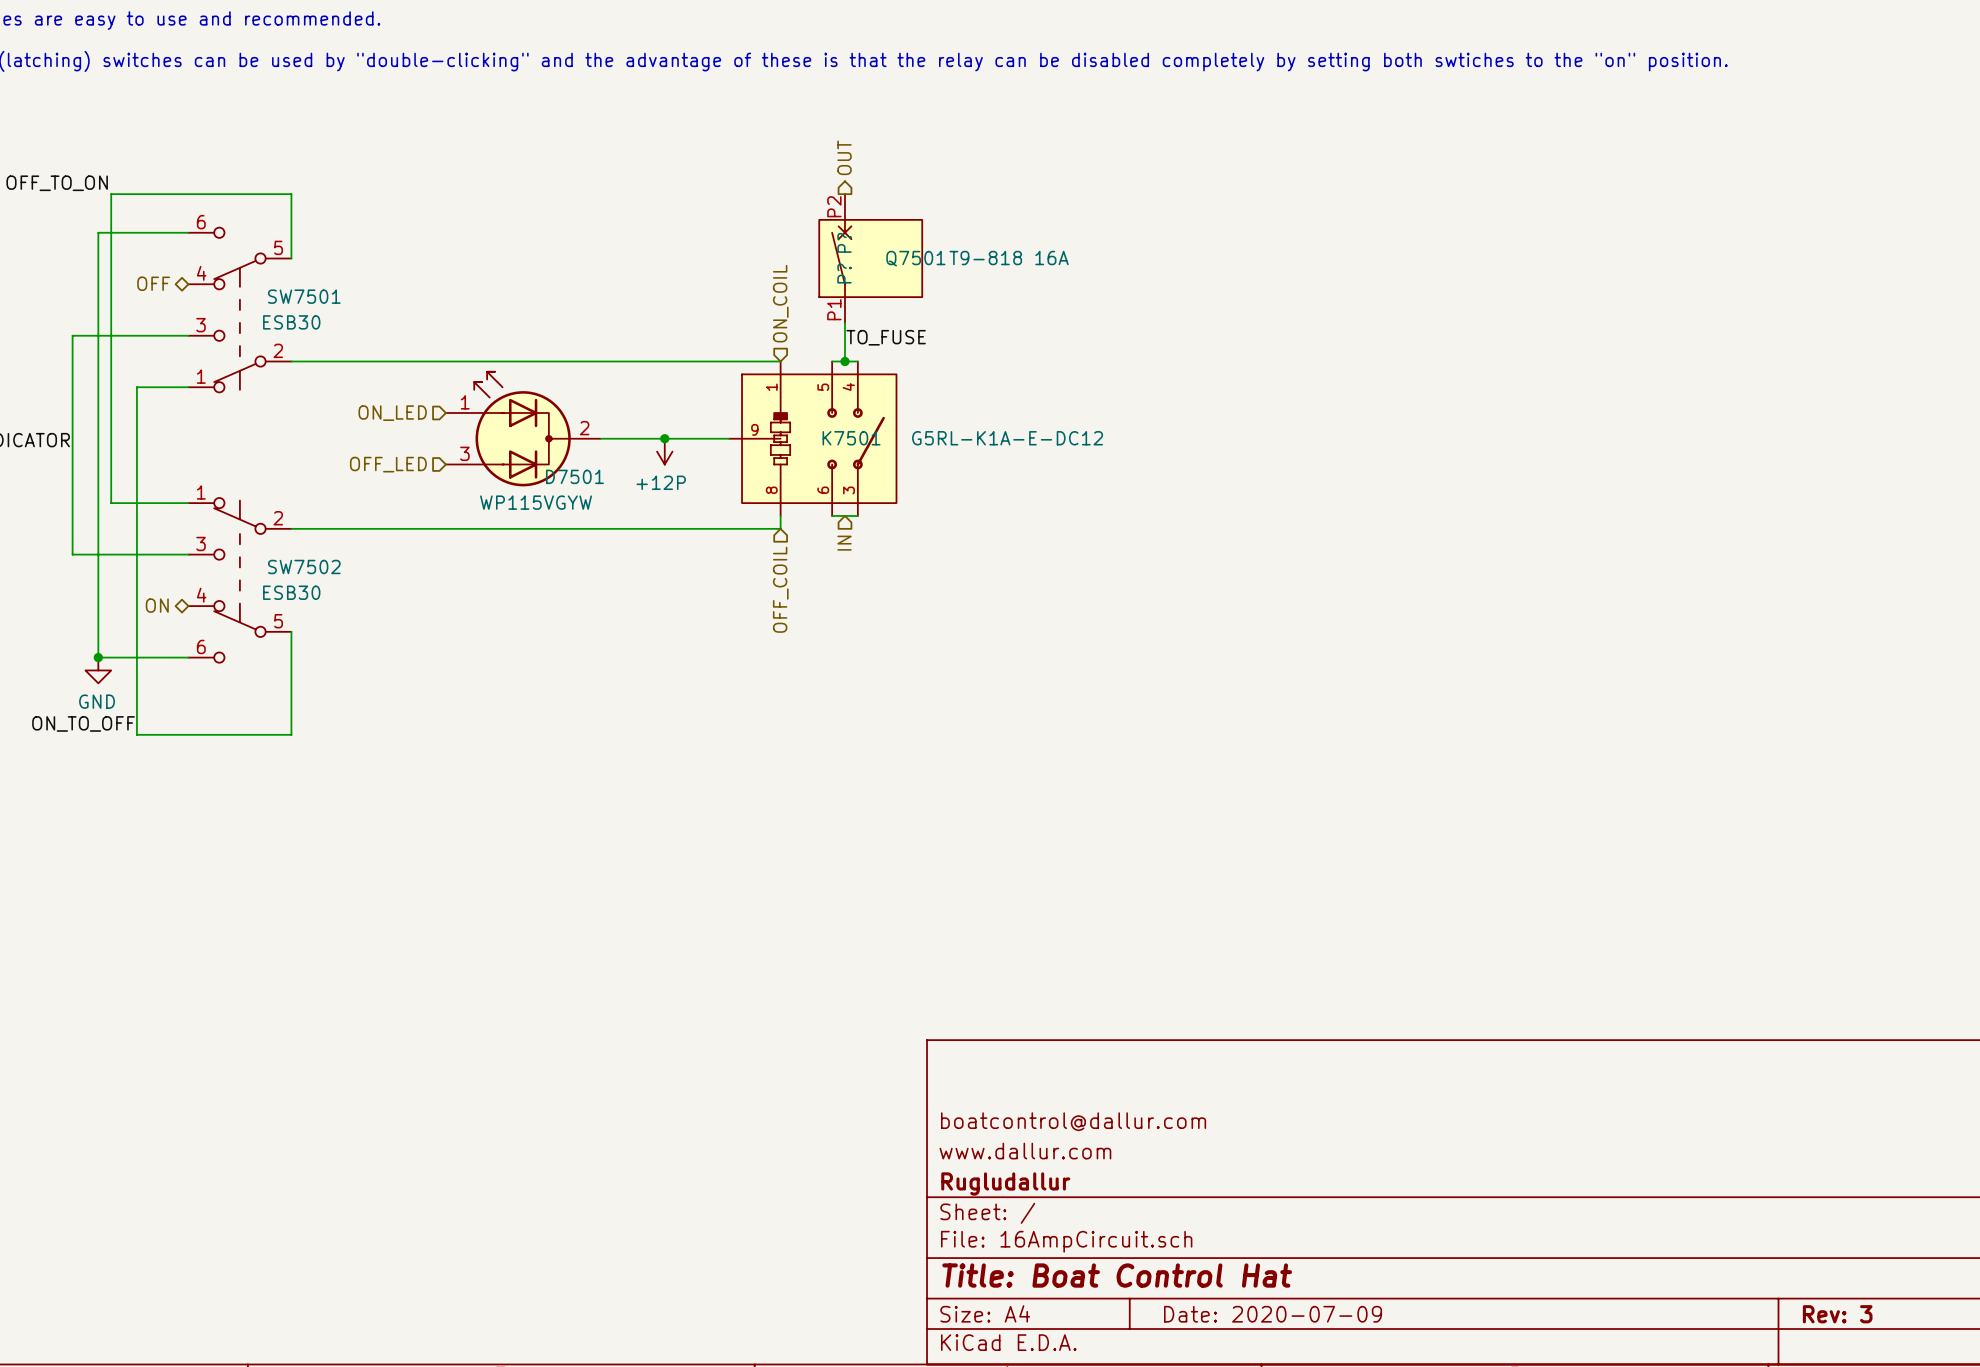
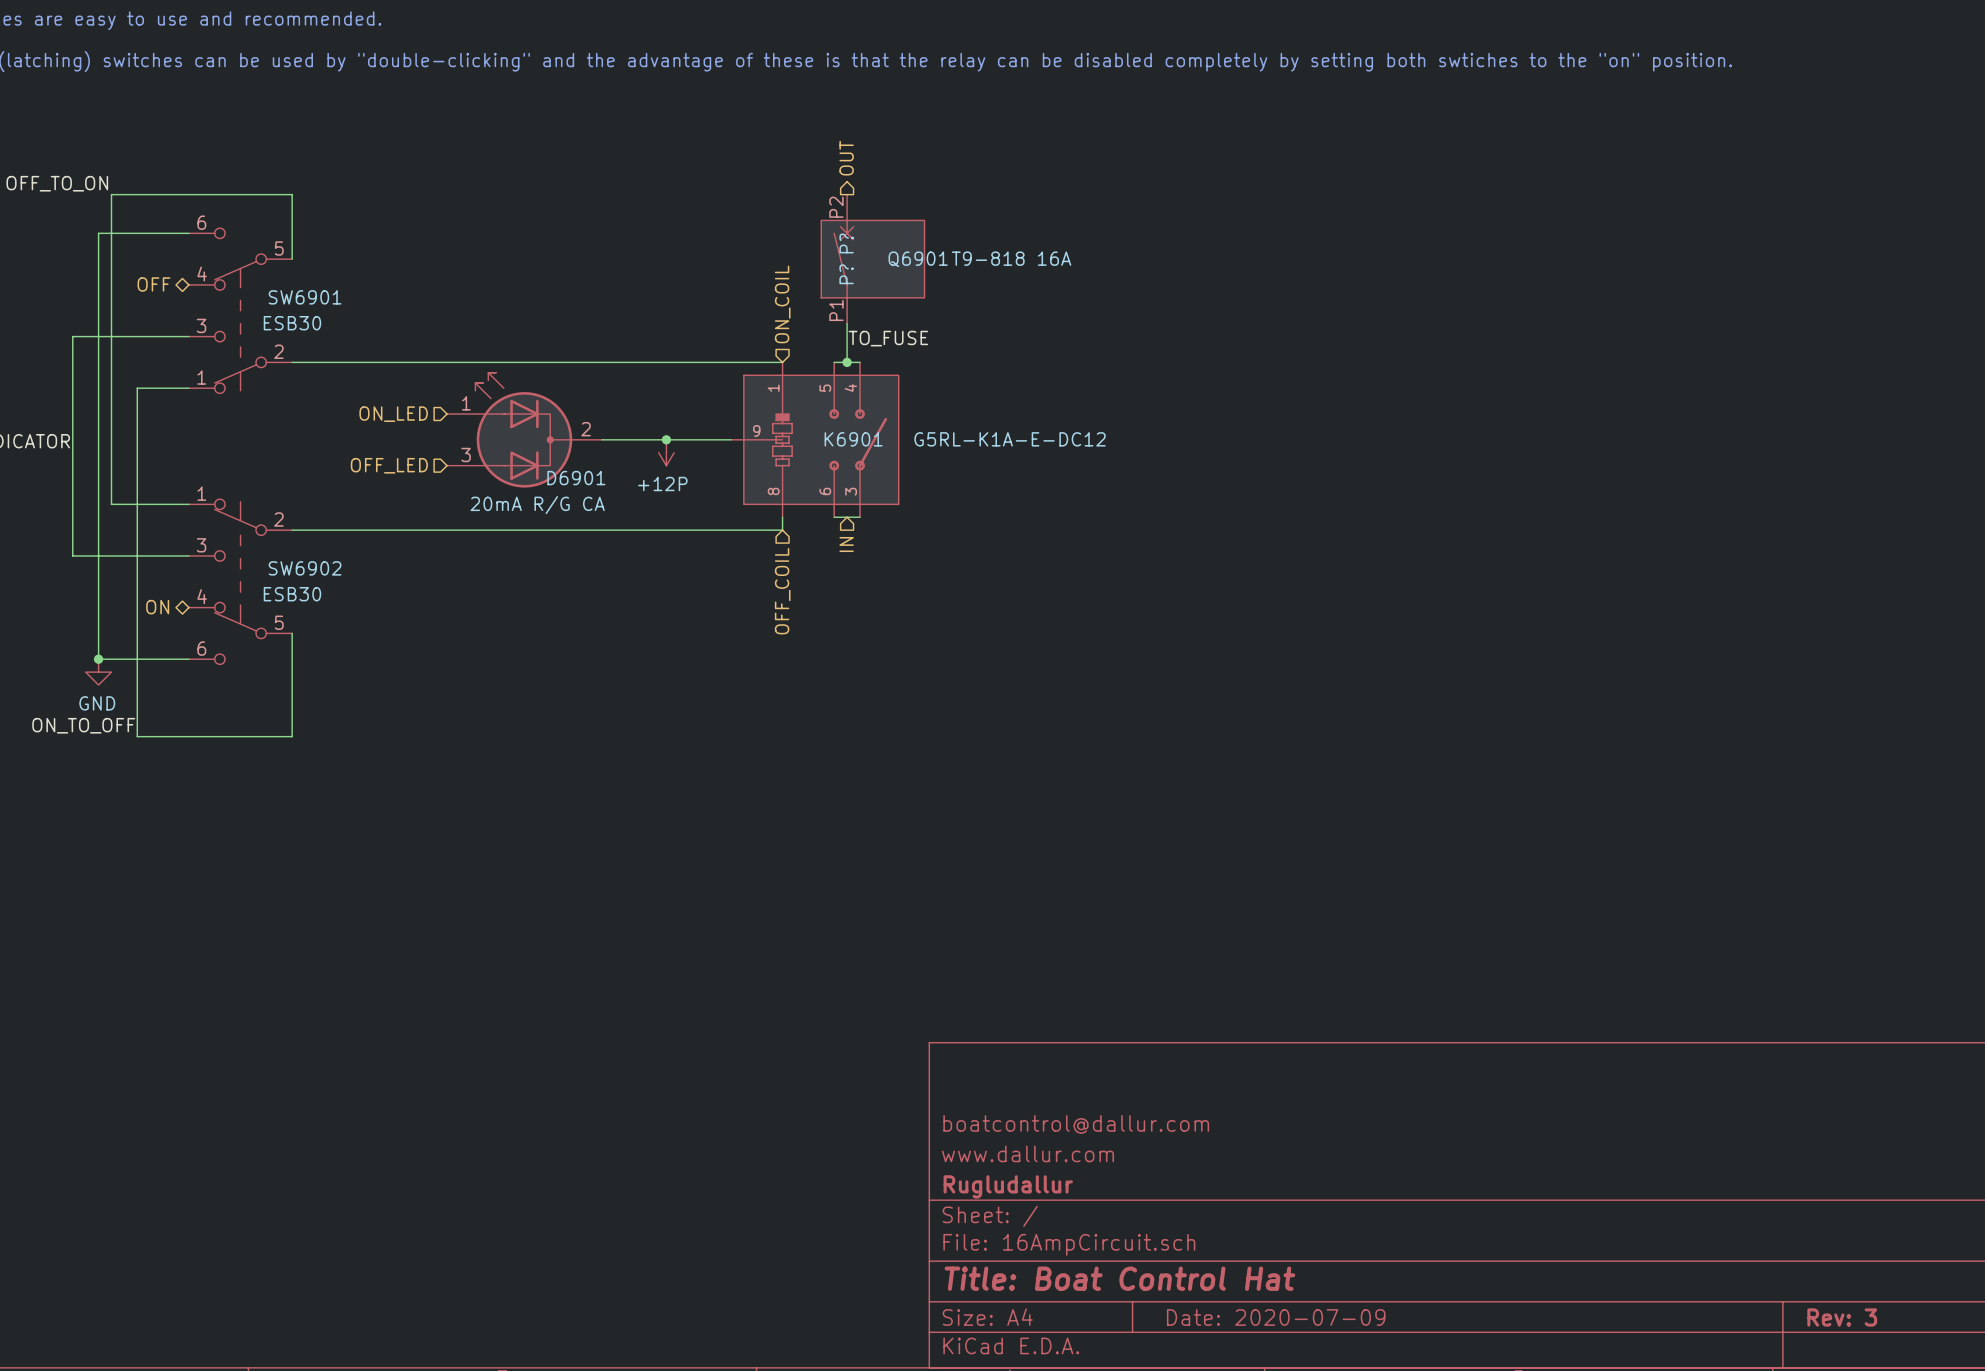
Q7501 name: Q7501 (915, 258) -> Q6901 (918, 259)
SW7501 name: SW7501 (304, 296) -> SW6901 (305, 297)
K7501 name: K7501 (851, 438) -> K6901 (853, 439)
D7501 name: D7501 (574, 476) -> D6901 (576, 478)
D7501 value: WP115VGYW (536, 502) -> 20mA R/G CA (537, 505)
SW7502 name: SW7502 (304, 566) -> SW6902 (305, 568)

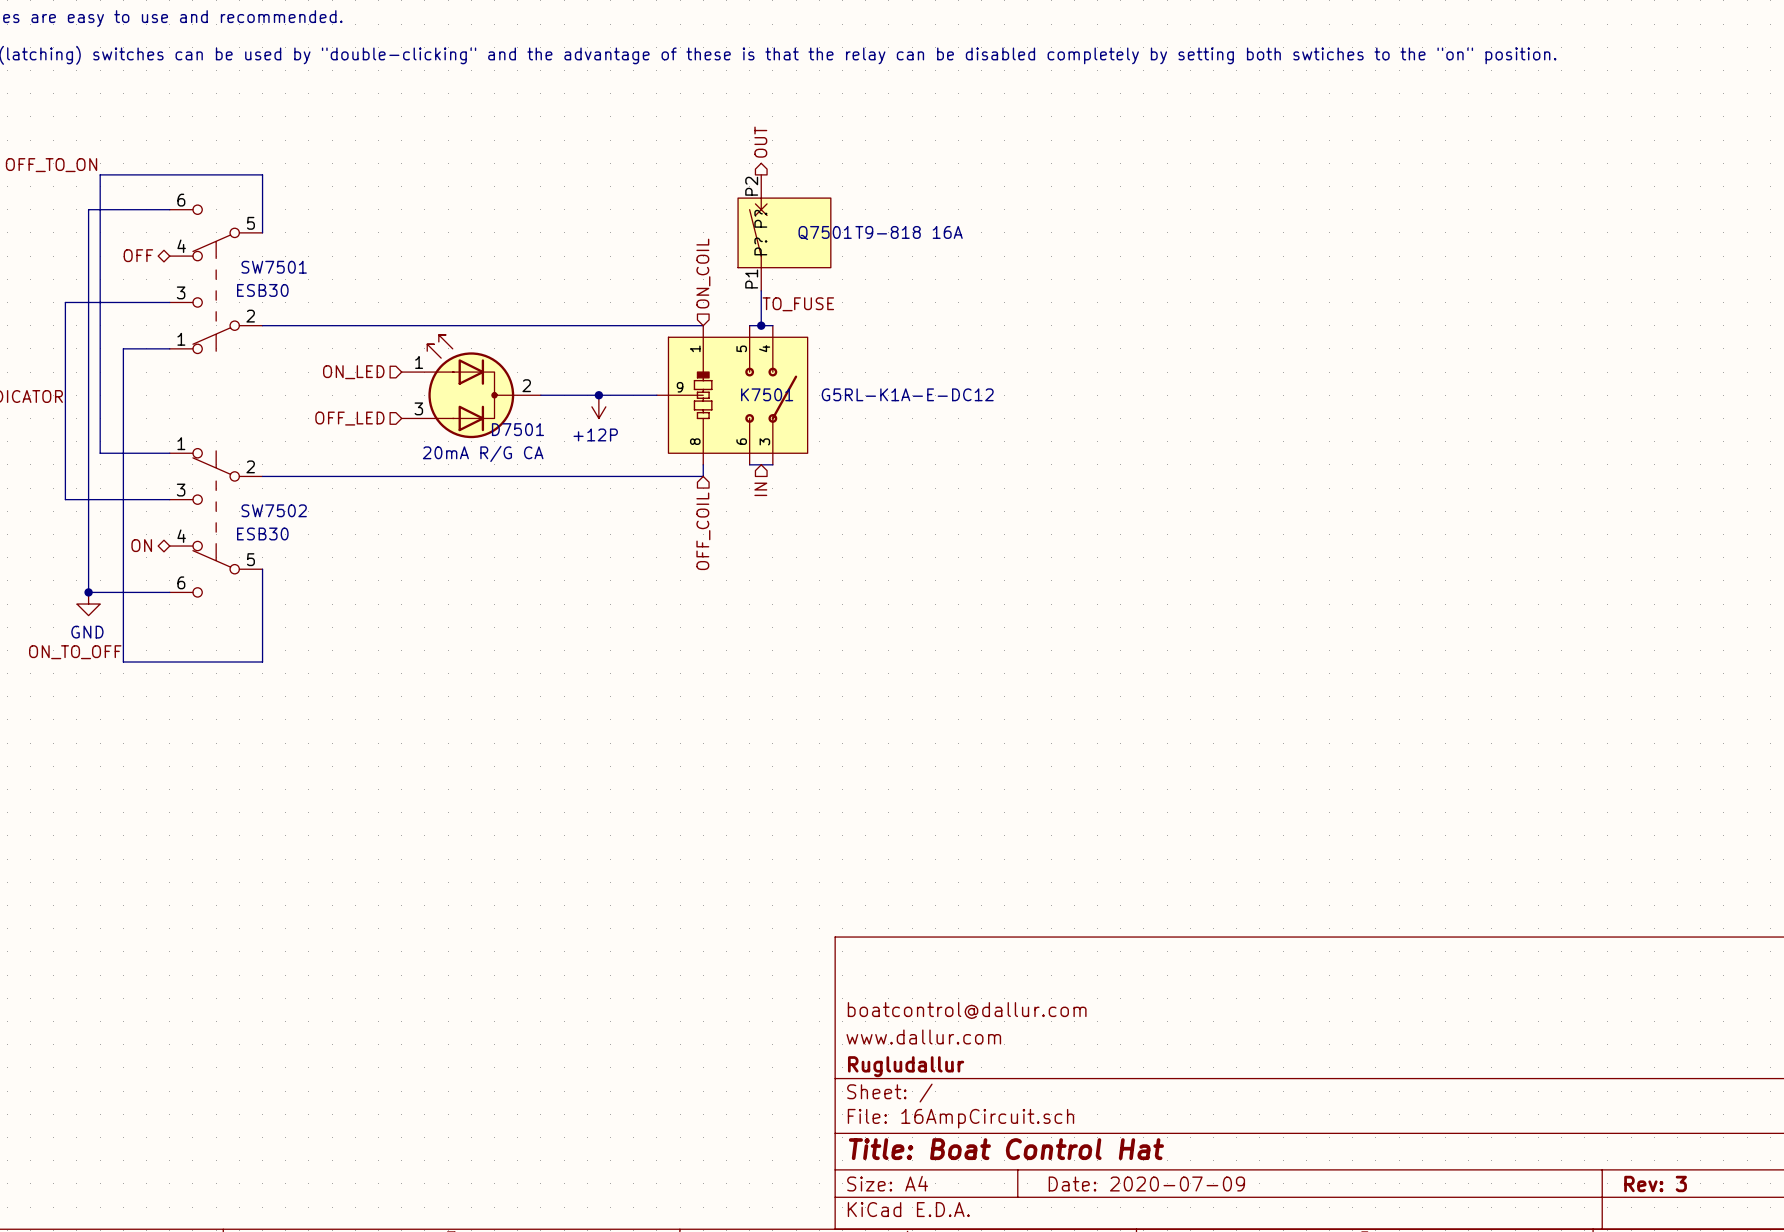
Q6901 name: Q6901 (918, 259) -> Q7501 (825, 233)
SW6901 name: SW6901 (305, 297) -> SW7501 (274, 267)
K6901 name: K6901 (853, 439) -> K7501 (767, 394)
D6901 name: D6901 (576, 478) -> D7501 (517, 429)
SW6902 name: SW6902 (305, 568) -> SW7502 (274, 510)

